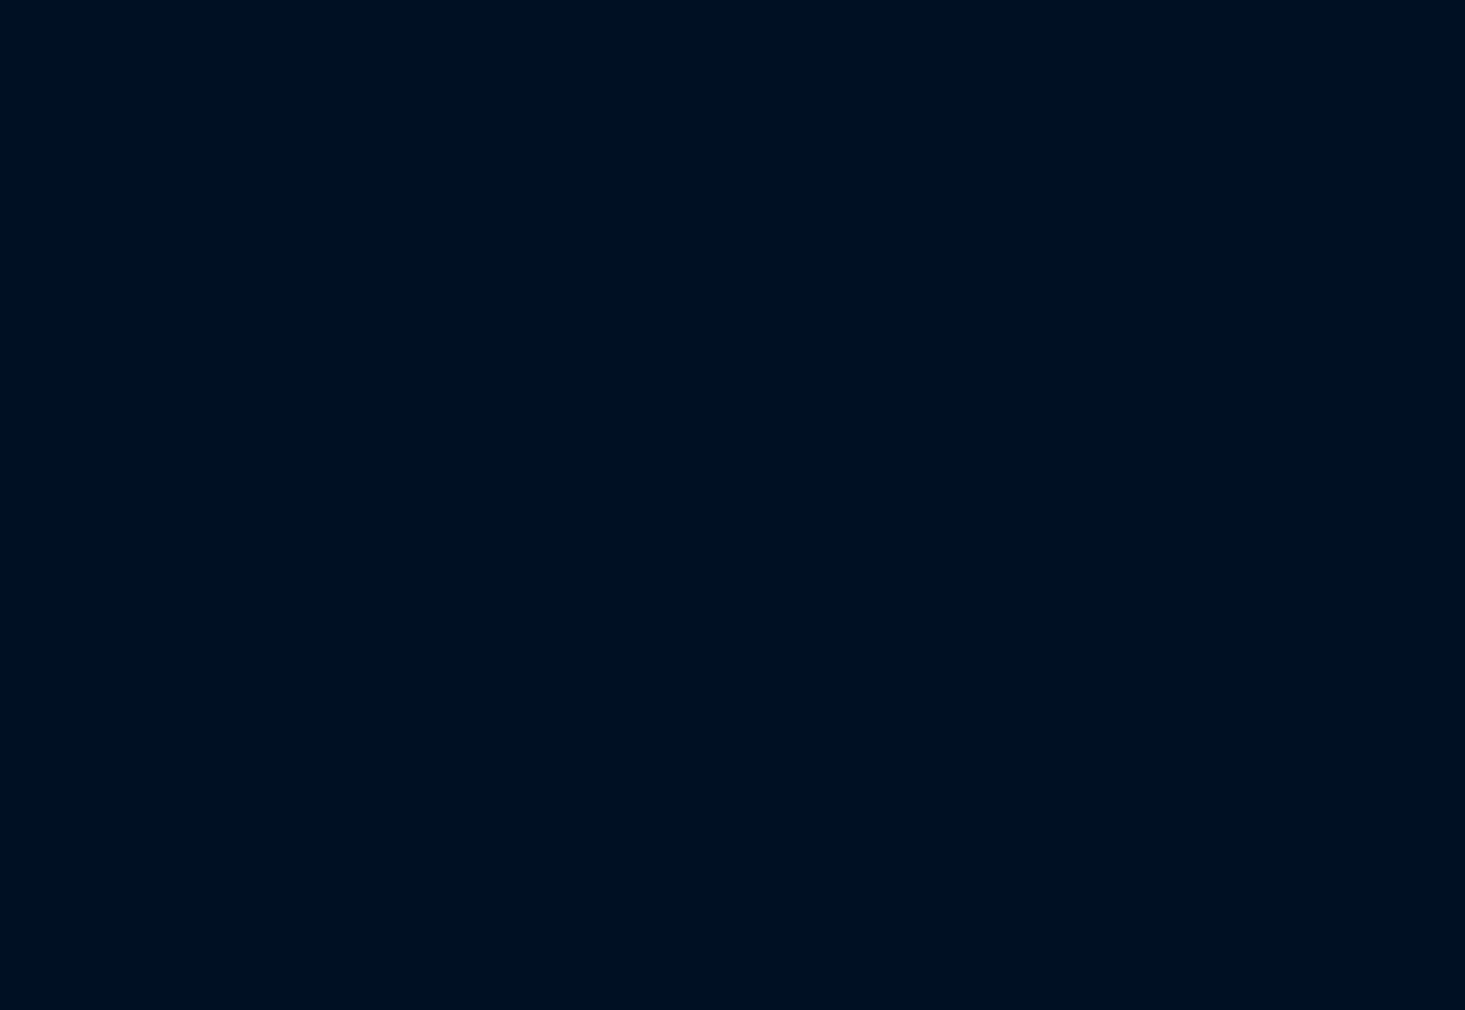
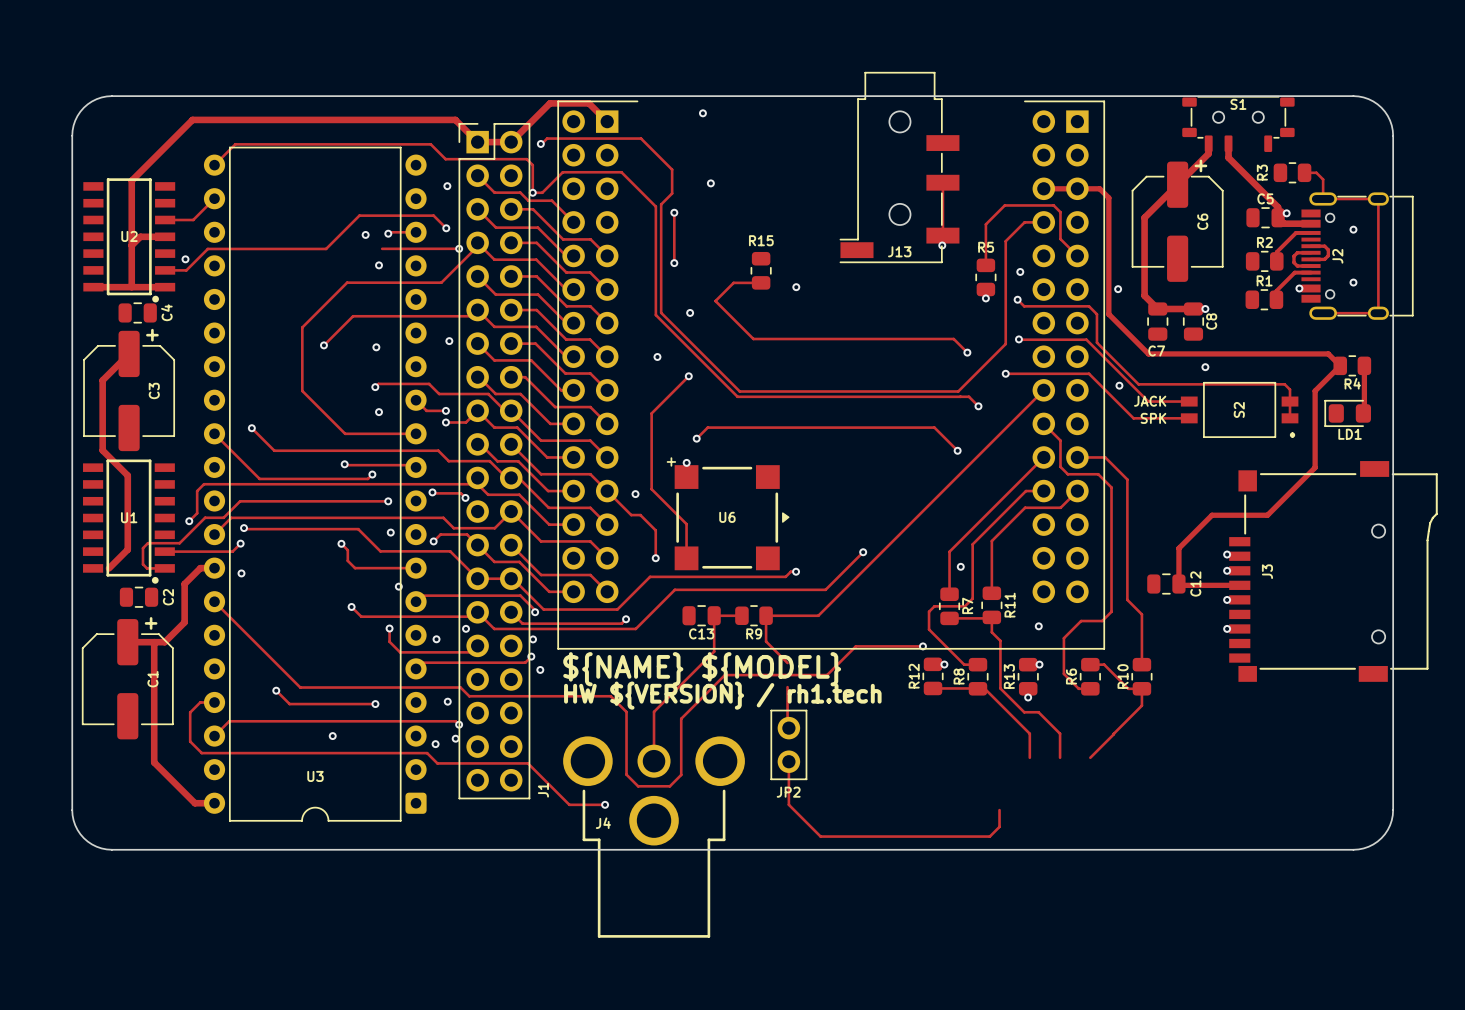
board edge: none -> (111, 96) (1353, 96) (1373, 101) (1387, 115) (1393, 135) (1393, 810) (1387, 829) (1373, 844) (1353, 849) (111, 849) (92, 844) (77, 829) (72, 810) (72, 135) (75, 120) (83, 107) (96, 99) (111, 96)
via: none -> (702, 113)
track: none -> (607, 121) (588, 103) (549, 103) (511, 142) (477, 142) (455, 119) (192, 119) (131, 180) (131, 287)
S1: none -> (1238, 123)
track: none -> (540, 143) (547, 138) (641, 138) (672, 169) (672, 193) (661, 204) (661, 312) (739, 391) (958, 391) (1005, 344) (1005, 241) (1024, 222) (1043, 222)
via: none -> (540, 143)
track: none -> (1208, 143) (1208, 153) (1144, 217) (1144, 295) (1157, 308) (1205, 308)
track: none -> (1228, 143) (1228, 157) (1278, 207) (1278, 212)
track: none -> (214, 165) (235, 144) (430, 144) (445, 159) (526, 159) (532, 165) (532, 192) (542, 192) (562, 172) (621, 172) (655, 206) (655, 315) (737, 396) (968, 396) (978, 406)
J13: none -> (899, 167)
R3: none -> (1292, 172)
track: none -> (1304, 172) (1316, 172) (1323, 179) (1323, 198) (1378, 198) (1378, 313) (1323, 313)
track: none -> (477, 175) (494, 192) (520, 192) (528, 200) (551, 200) (573, 222)
track: none -> (942, 179) (942, 232)
via: none -> (710, 183)
via: none -> (447, 186)
track: none -> (1043, 188) (1099, 188) (1108, 197) (1108, 314) (1148, 353) (1328, 353) (1340, 365) (1315, 390) (1315, 467) (1267, 515) (1212, 515) (1178, 548) (1178, 584)
via: none -> (532, 192)
track: none -> (214, 198) (193, 220) (165, 220)
track: none -> (477, 209) (495, 227) (537, 227) (566, 255)
track: none -> (511, 209) (533, 209) (563, 239) (590, 239) (607, 255)
track: none -> (674, 212) (674, 263)
via: none -> (674, 212)
via: none -> (1286, 213)
C5: none -> (1265, 217)
track: none -> (1278, 217) (1284, 223) (1311, 223)
C6: none -> (1177, 221)
track: none -> (446, 228) (433, 215) (359, 215) (326, 248) (207, 248) (186, 270) (165, 270)
via: none -> (446, 228)
via: none -> (1353, 229)
track: none -> (416, 232) (388, 233)
track: none -> (1311, 232) (1295, 232) (1276, 252) (1276, 261)
via: none -> (388, 233)
via: none -> (365, 234)
track: none -> (165, 236) (140, 236) (131, 245)
U2: none -> (129, 240)
track: none -> (477, 242) (494, 259) (536, 259) (566, 289)
track: none -> (511, 242) (536, 242) (566, 272) (590, 272) (607, 289)
via: none -> (942, 245)
track: none -> (477, 246) (441, 282) (347, 282) (302, 327) (302, 390) (345, 433) (416, 433)
track: none -> (1311, 246) (1324, 246) (1328, 249) (1328, 255) (1324, 259) (1311, 259)
track: none -> (382, 248) (459, 248)
via: none -> (459, 248)
track: none -> (1311, 252) (1297, 252) (1293, 256) (1293, 262) (1297, 266) (1311, 266)
track: none -> (1077, 255) (1060, 239) (1060, 212) (1053, 205) (1004, 205) (985, 224) (985, 265)
J2: none -> (1357, 256)
via: none -> (185, 259)
R2: none -> (1264, 261)
via: none -> (674, 263)
via: none -> (379, 265)
R15: none -> (761, 270)
via: none -> (1020, 271)
track: none -> (1311, 272) (1294, 272) (1276, 290) (1276, 299)
track: none -> (477, 276) (495, 294) (537, 294) (566, 323)
track: none -> (511, 276) (536, 276) (566, 306) (590, 306) (607, 323)
R5: none -> (985, 277)
track: none -> (761, 282) (733, 282) (715, 301) (753, 339) (953, 339) (967, 352)
via: none -> (1353, 282)
track: none -> (93, 287) (165, 287)
via: none -> (796, 287)
via: none -> (1299, 288)
via: none -> (1118, 289)
via: none -> (985, 298)
track: none -> (1017, 299) (1024, 306) (1089, 306) (1096, 314) (1096, 342) (1138, 384) (1284, 384) (1290, 389) (1290, 418)
via: none -> (1017, 299)
R1: none -> (1264, 299)
via: none -> (1205, 308)
track: none -> (477, 310) (494, 326) (536, 326) (566, 356)
track: none -> (511, 310) (536, 310) (566, 339) (590, 339) (607, 356)
C4: none -> (137, 312)
via: none -> (690, 312)
track: none -> (471, 316) (353, 316) (323, 345)
C7: none -> (1157, 321)
C8: none -> (1193, 321)
track: none -> (1018, 339) (1086, 339) (1148, 401) (1189, 401)
via: none -> (1018, 339)
via: none -> (449, 341)
track: none -> (477, 343) (494, 360) (531, 360) (561, 390) (573, 390)
track: none -> (511, 343) (535, 343) (565, 373) (590, 373) (607, 390)
via: none -> (323, 345)
via: none -> (376, 347)
via: none -> (967, 352)
track: none -> (129, 353) (102, 380) (102, 450) (127, 475) (127, 549) (109, 568)
via: none -> (657, 356)
R4: none -> (1352, 365)
track: none -> (1364, 365) (1364, 412)
via: none -> (1205, 367)
track: none -> (1005, 373) (1089, 373) (1133, 418) (1189, 418)
via: none -> (1005, 373)
part: none -> (831, 375)
track: none -> (688, 376) (651, 413) (651, 489) (686, 524) (686, 558)
via: none -> (688, 376)
track: none -> (479, 377) (495, 394) (520, 394) (550, 423) (573, 423)
track: none -> (511, 377) (525, 377) (555, 407) (590, 407) (607, 423)
via: none -> (1119, 385)
track: none -> (375, 387) (378, 383) (429, 383) (439, 394) (488, 394) (505, 410)
via: none -> (375, 387)
C3: none -> (129, 390)
track: none -> (1043, 390) (818, 615) (766, 615) (766, 641) (787, 663)
track: none -> (416, 400) (426, 410) (445, 410)
text: none -> JACK (1150, 401)
via: none -> (978, 406)
S2: none -> (1239, 409)
via: none -> (445, 410)
track: none -> (511, 410) (541, 440) (590, 440) (607, 457)
via: none -> (379, 412)
LD1: none -> (1347, 413)
text: none -> SPK (1153, 418)
track: none -> (445, 422) (465, 422) (477, 410) (494, 427) (517, 427) (547, 457) (573, 457)
via: none -> (445, 422)
track: none -> (1043, 423) (1060, 440) (1060, 466) (1067, 474) (1098, 474) (1111, 487) (1111, 611) (1102, 621) (1081, 621) (1063, 638) (1063, 673) (1078, 688) (1090, 688)
track: none -> (251, 428) (274, 450) (438, 450) (448, 461) (489, 461) (506, 477)
via: none -> (251, 428)
track: none -> (214, 433) (259, 478) (367, 478) (372, 474)
track: none -> (696, 438) (707, 427) (934, 427) (957, 450)
via: none -> (696, 438)
track: none -> (480, 444) (497, 461) (518, 461) (548, 491) (573, 491)
track: none -> (511, 444) (541, 474) (590, 474) (631, 515) (640, 515) (655, 530) (655, 558)
via: none -> (957, 450)
track: none -> (1043, 457) (949, 551) (949, 594)
track: none -> (1077, 457) (1105, 457) (1127, 479) (1127, 599) (1141, 614) (1141, 664)
J1: none -> (494, 461)
via: none -> (686, 462)
track: none -> (344, 464) (413, 465)
via: none -> (344, 464)
via: none -> (372, 474)
track: none -> (518, 477) (548, 507) (590, 507) (607, 524)
U3: none -> (315, 484)
track: none -> (1043, 491) (1025, 491) (972, 544) (972, 598) (964, 606) (934, 606) (929, 611) (929, 629) (964, 664) (977, 664)
track: none -> (1077, 491) (1060, 507) (1025, 507) (991, 541) (991, 593)
track: none -> (432, 492) (460, 493) (465, 497)
via: none -> (432, 492)
via: none -> (635, 494)
via: none -> (465, 497)
track: none -> (388, 501) (240, 501) (223, 517) (205, 517) (179, 543) (147, 543) (142, 548) (142, 564) (147, 568) (164, 568)
via: none -> (388, 501)
track: none -> (511, 511) (541, 541) (590, 541) (607, 558)
track: none -> (511, 511) (494, 528) (453, 528) (443, 517) (231, 517) (214, 534)
U6: none -> (728, 513)
U1: none -> (128, 521)
track: none -> (189, 521) (197, 513) (197, 491) (204, 484) (477, 484) (488, 494) (519, 494) (549, 524) (573, 524)
via: none -> (189, 521)
track: none -> (244, 528) (358, 529) (380, 551) (450, 551) (477, 578) (511, 578)
via: none -> (244, 528)
via: none -> (390, 532)
track: none -> (433, 541) (440, 534) (467, 534) (494, 561) (519, 561) (549, 591) (573, 591)
via: none -> (433, 541)
track: none -> (240, 543) (232, 551) (164, 551)
via: none -> (240, 543)
track: none -> (341, 543) (347, 550) (347, 560) (355, 568) (416, 568)
via: none -> (341, 543)
track: none -> (511, 545) (541, 575) (590, 575) (607, 591)
track: none -> (863, 552) (825, 589) (674, 589) (635, 628) (494, 628) (477, 612)
via: none -> (863, 552)
via: none -> (1227, 554)
via: none -> (655, 558)
via: none -> (960, 566)
track: none -> (214, 568) (200, 568) (184, 584) (184, 622) (164, 642) (127, 642)
via: none -> (1227, 570)
track: none -> (796, 571) (790, 571) (785, 576) (650, 576) (617, 609) (543, 609) (512, 578)
via: none -> (796, 571)
J3: none -> (1333, 571)
via: none -> (241, 573)
C12: none -> (1166, 584)
track: none -> (1180, 585) (1239, 585)
via: none -> (398, 586)
track: none -> (422, 595) (520, 595) (535, 612)
C2: none -> (139, 597)
via: none -> (1227, 599)
track: none -> (214, 601) (300, 687) (460, 687) (469, 696) (610, 696) (626, 712) (626, 774) (638, 786) (669, 786) (681, 774) (681, 718) (724, 675) (827, 675) (855, 646) (922, 646)
R11: none -> (991, 605)
track: none -> (351, 606) (361, 616) (473, 616)
via: none -> (351, 606)
R7: none -> (949, 606)
track: none -> (511, 612) (522, 623) (621, 623) (626, 619)
via: none -> (535, 612)
C13: none -> (701, 615)
track: none -> (741, 615) (714, 615) (714, 651) (654, 711) (654, 761)
R9: none -> (754, 615)
track: none -> (991, 617) (991, 632) (1000, 640) (1000, 688) (1024, 712) (1038, 712) (1060, 733) (1060, 757)
track: none -> (949, 618) (990, 618)
via: none -> (626, 619)
via: none -> (1038, 626)
track: none -> (389, 628) (389, 641) (400, 652) (471, 652)
via: none -> (389, 628)
via: none -> (466, 628)
via: none -> (1227, 628)
via: none -> (436, 639)
via: none -> (533, 639)
track: none -> (154, 642) (154, 762) (194, 803) (214, 803)
via: none -> (922, 646)
track: none -> (531, 656) (525, 662) (422, 662)
via: none -> (531, 656)
via: none -> (944, 664)
via: none -> (1039, 664)
track: none -> (1090, 664) (1104, 664) (1128, 688) (1141, 688) (1141, 705) (1090, 757)
text: none -> ${NAME} ${MODEL} (702, 669)
via: none -> (540, 669)
R12: none -> (933, 676)
R8: none -> (977, 676)
R13: none -> (1028, 676)
R6: none -> (1090, 676)
R10: none -> (1141, 676)
C1: none -> (127, 679)
track: none -> (787, 687) (787, 726)
track: none -> (933, 688) (977, 688)
track: none -> (984, 688) (1029, 733) (1029, 757)
track: none -> (276, 690) (289, 704) (375, 704)
via: none -> (276, 690)
text: none -> HW ${VERSION} / rh1.tech (722, 695)
via: none -> (1028, 697)
via: none -> (447, 701)
track: none -> (214, 702) (200, 702) (190, 712) (190, 741) (201, 753) (427, 753) (437, 763) (528, 763) (569, 804) (605, 804)
via: none -> (375, 704)
track: none -> (459, 724) (455, 721) (229, 721) (214, 736)
via: none -> (459, 724)
via: none -> (332, 736)
via: none -> (455, 738)
via: none -> (435, 744)
JP2: none -> (788, 744)
track: none -> (788, 761) (788, 804) (820, 836) (989, 836) (999, 826) (999, 810)
via: none -> (605, 804)
J4: none -> (654, 837)

